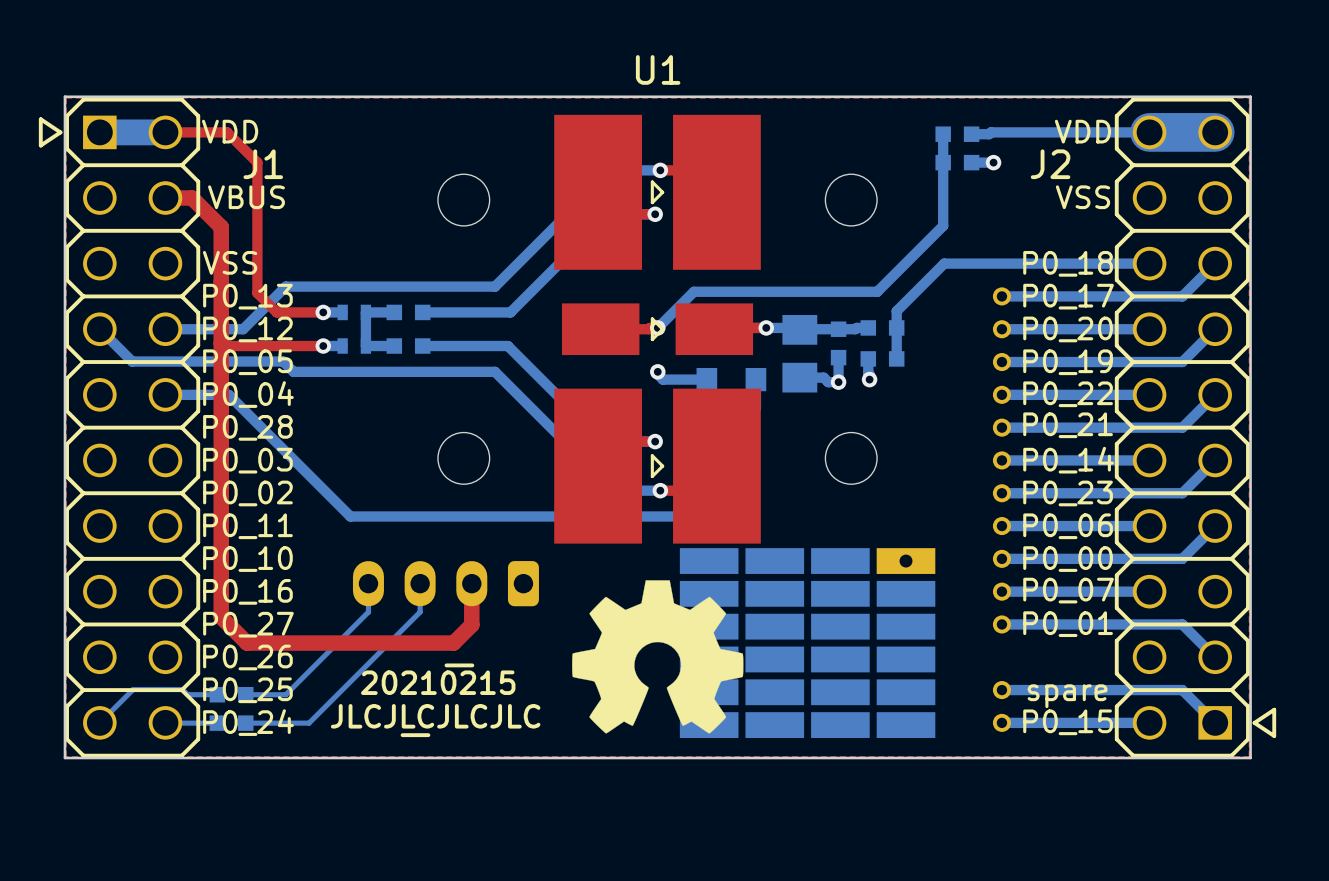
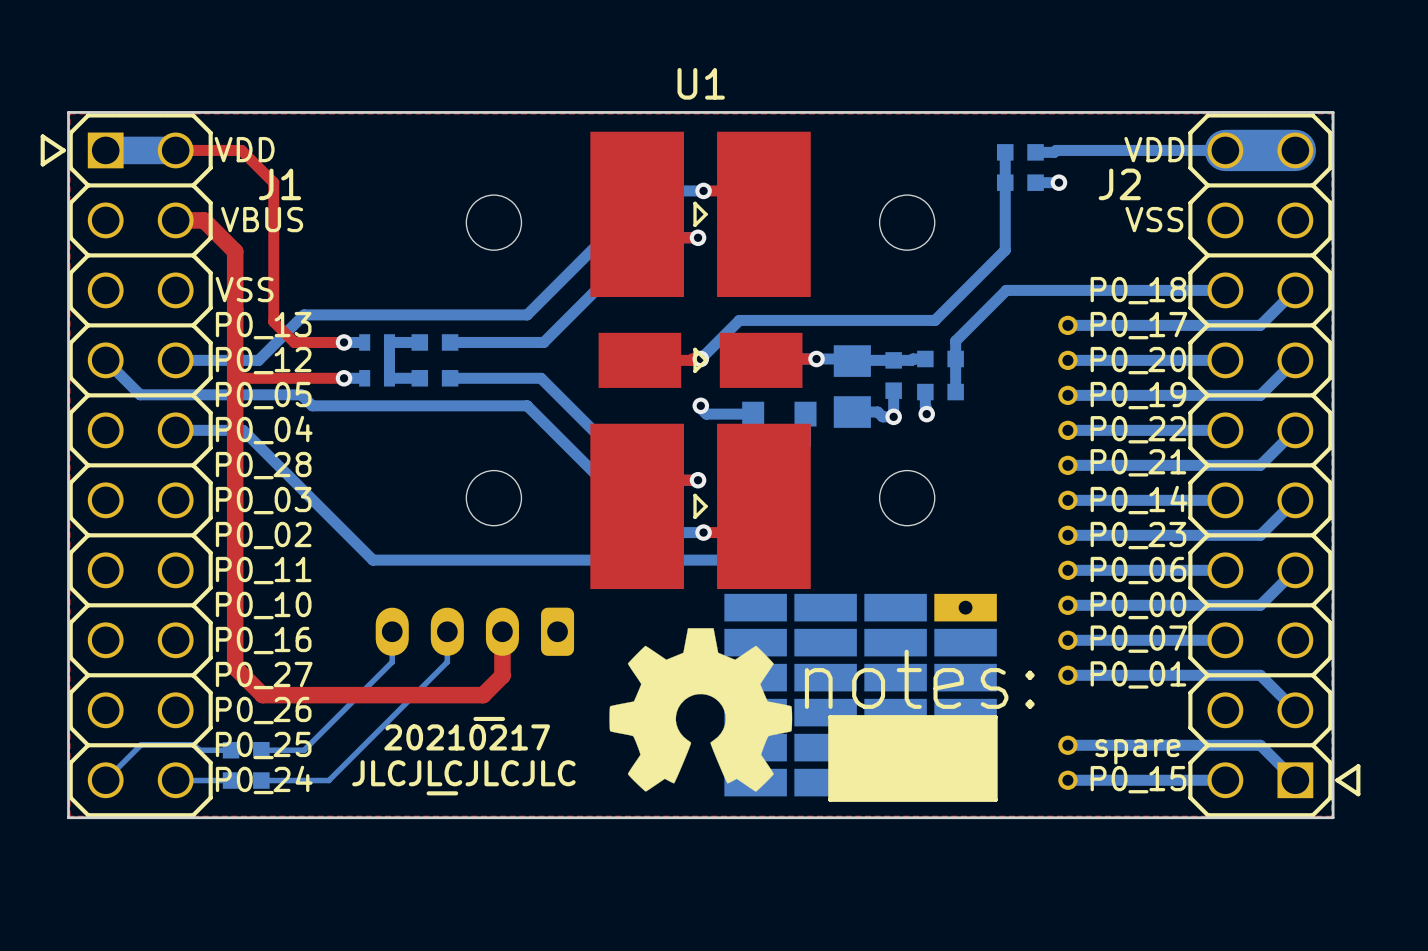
drawing: none -> [828, 715, 998, 802]
drawing shape: [361, 663, 516, 695] -> [384, 716, 551, 751]

